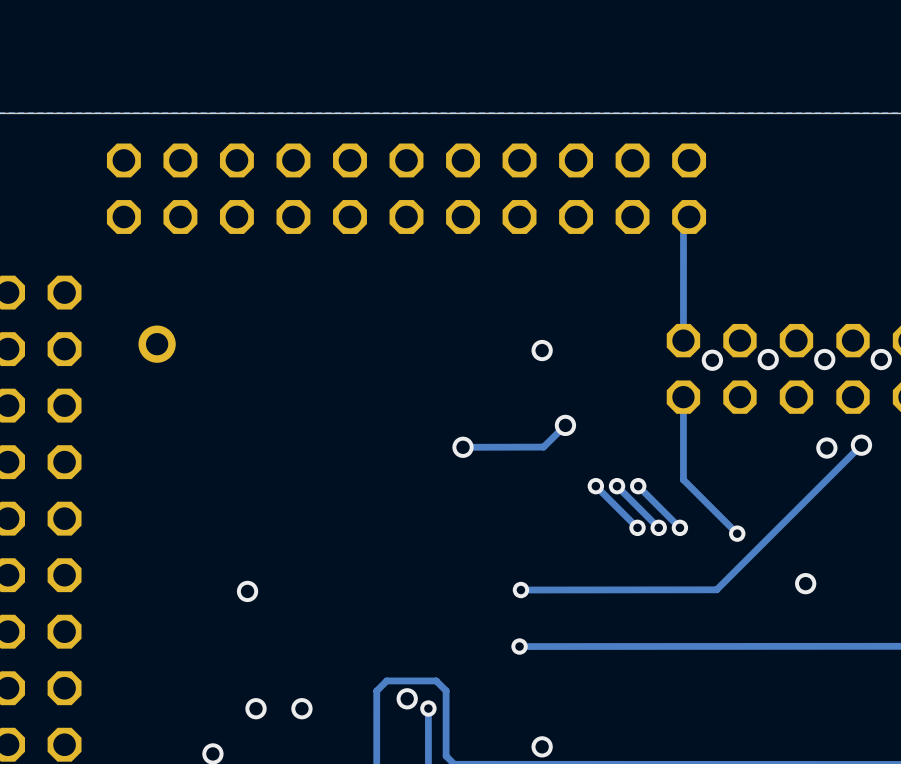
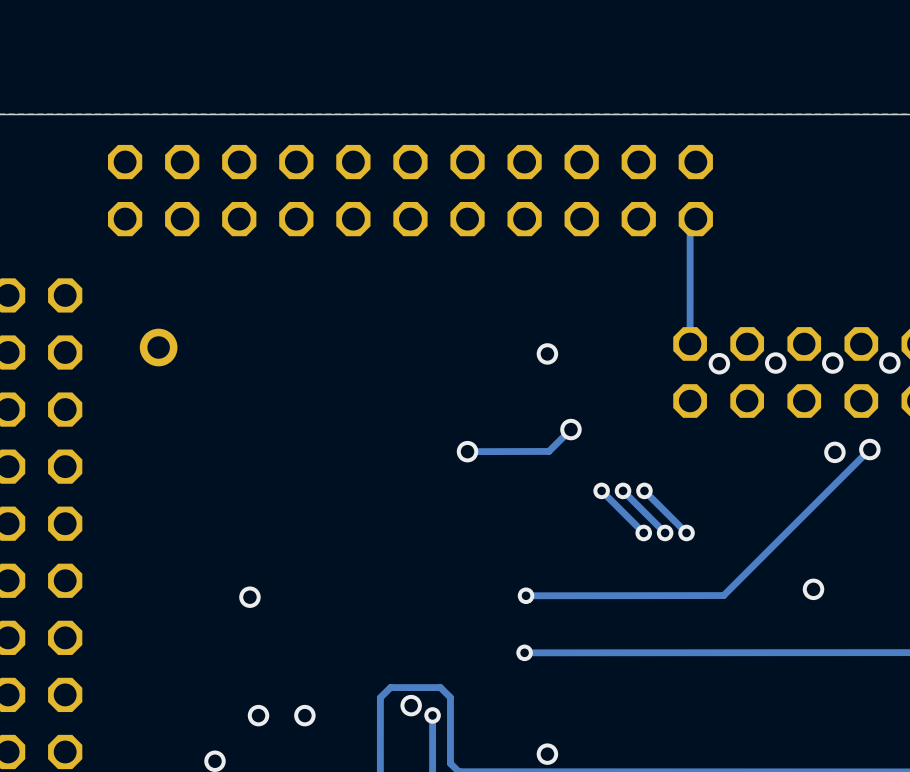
track: (683, 397) (683, 479) (737, 533) -> none
via: (737, 533) -> none

